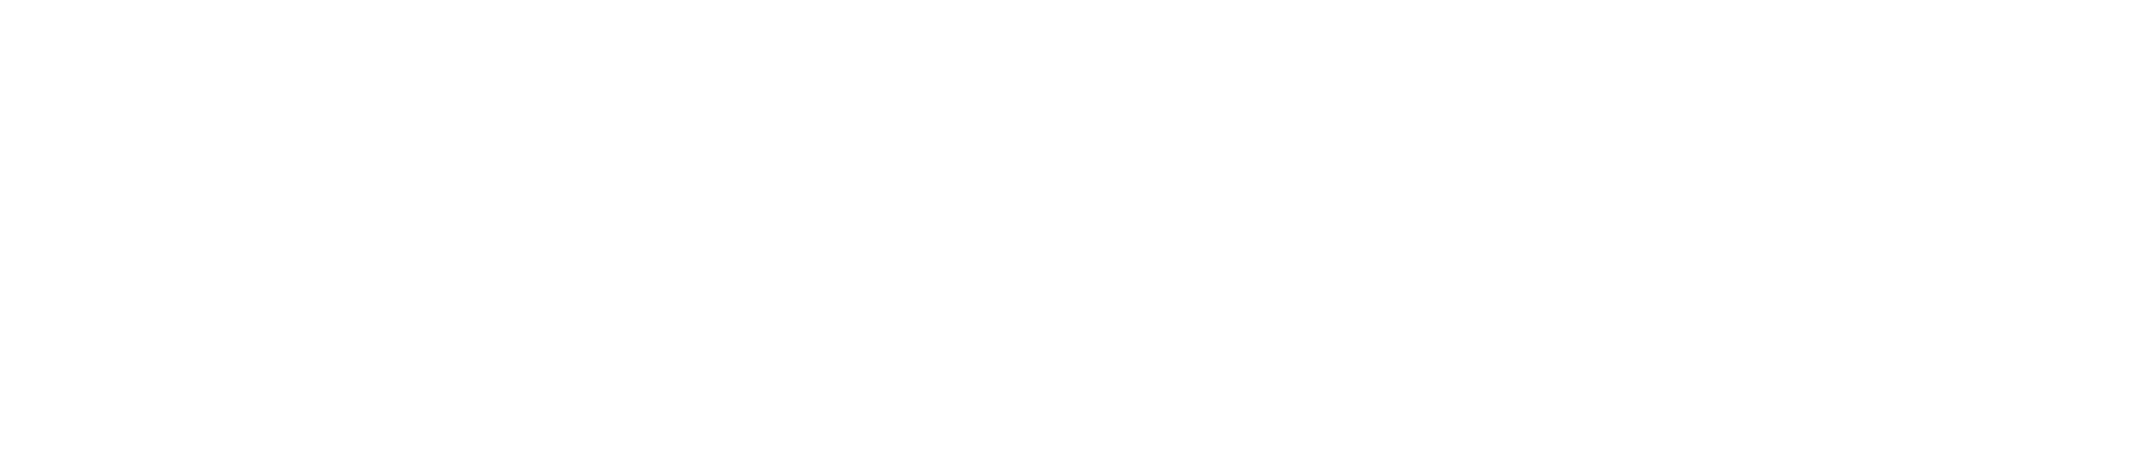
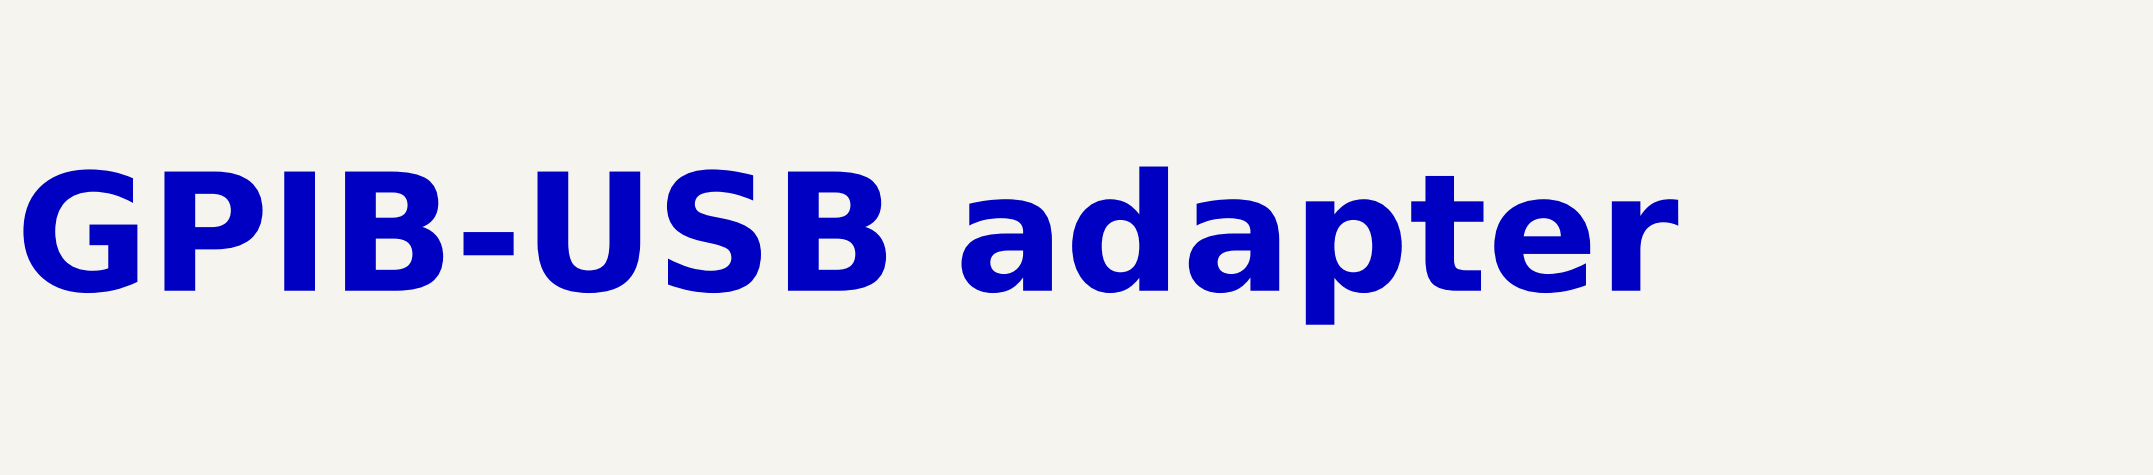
text: none -> GPIB-USB adapter (850, 245)

